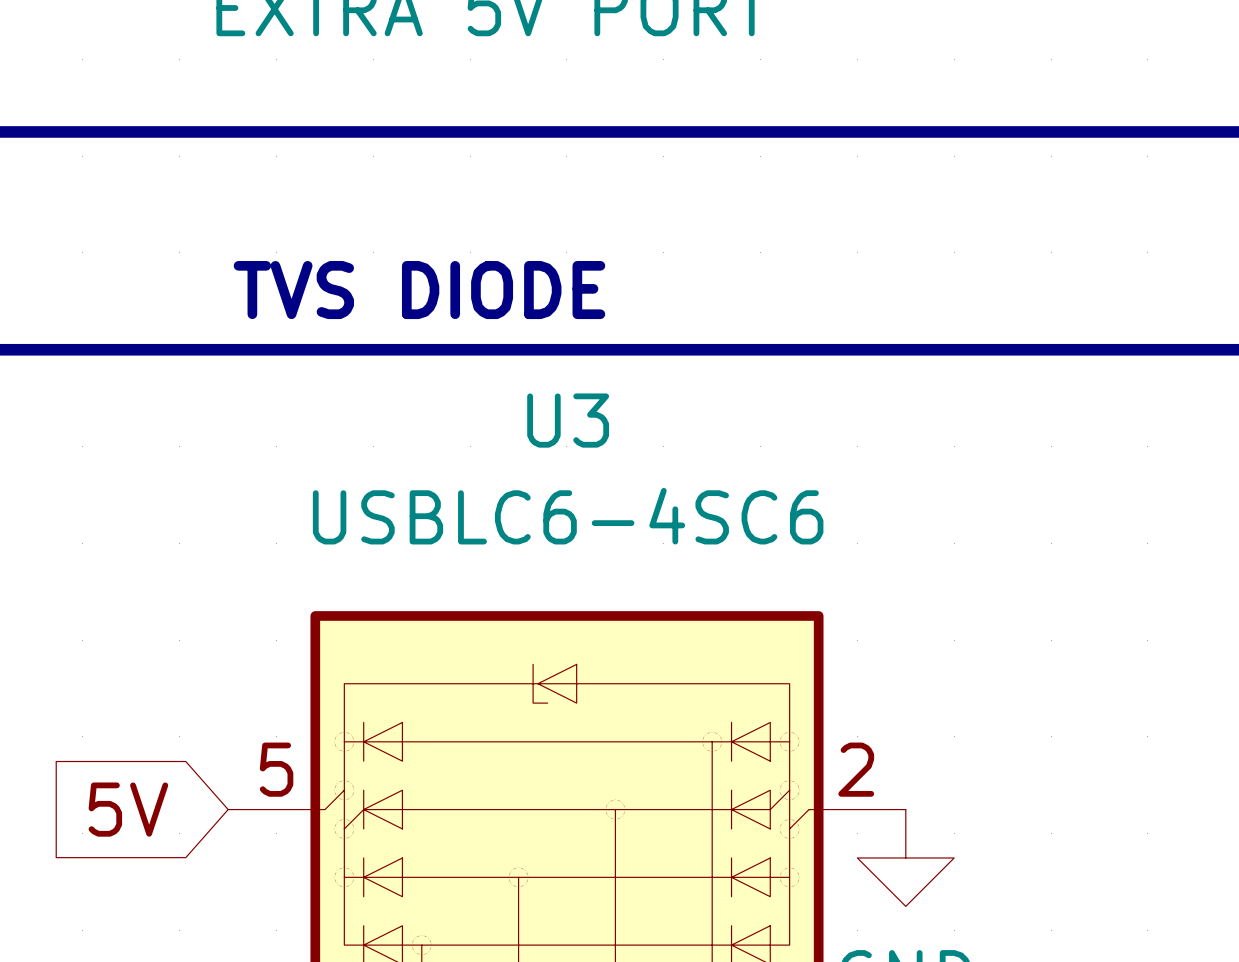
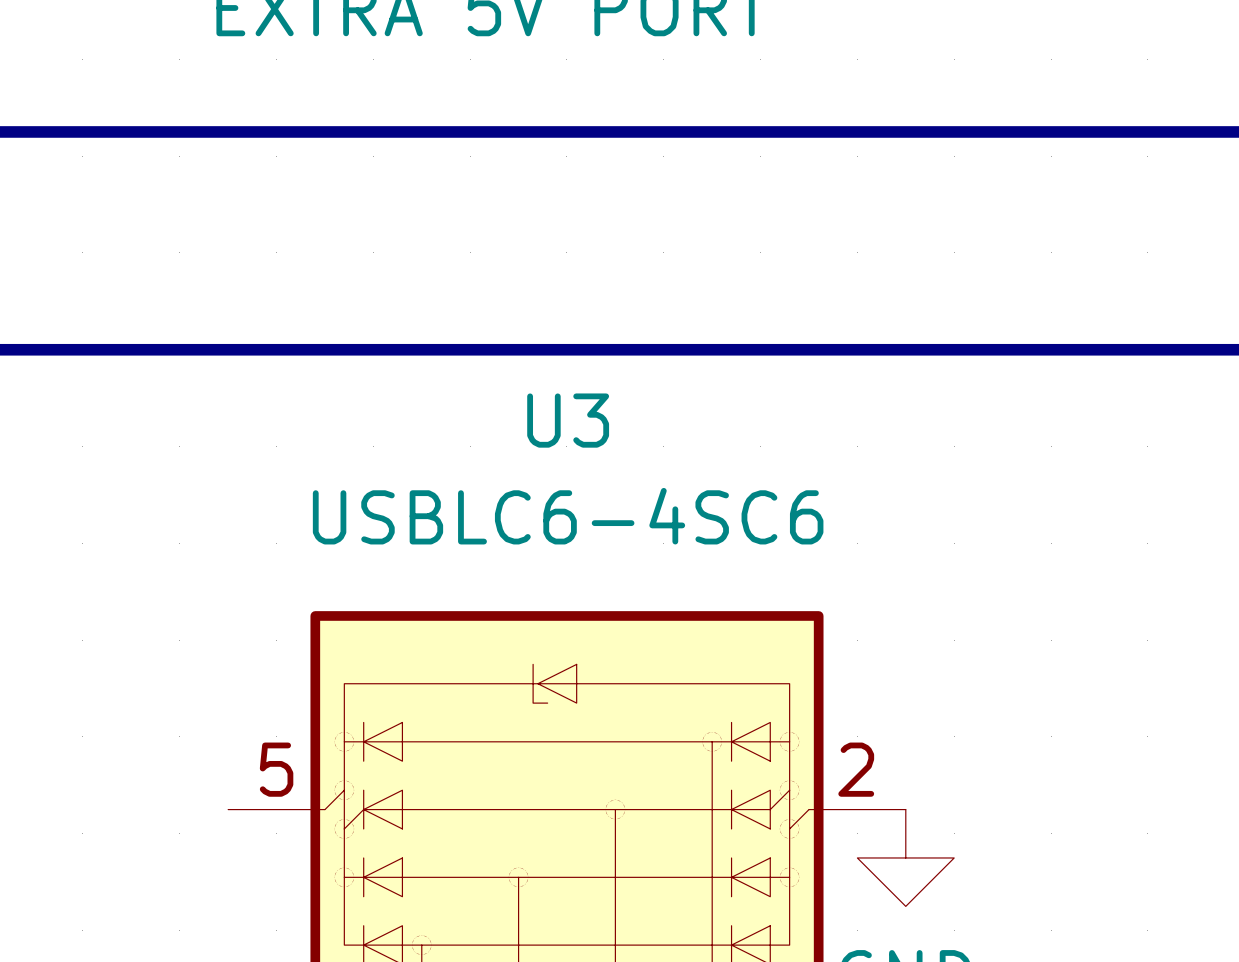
text: TVS DIODE (419, 290) -> none
global label: 5V (128, 809) -> none

